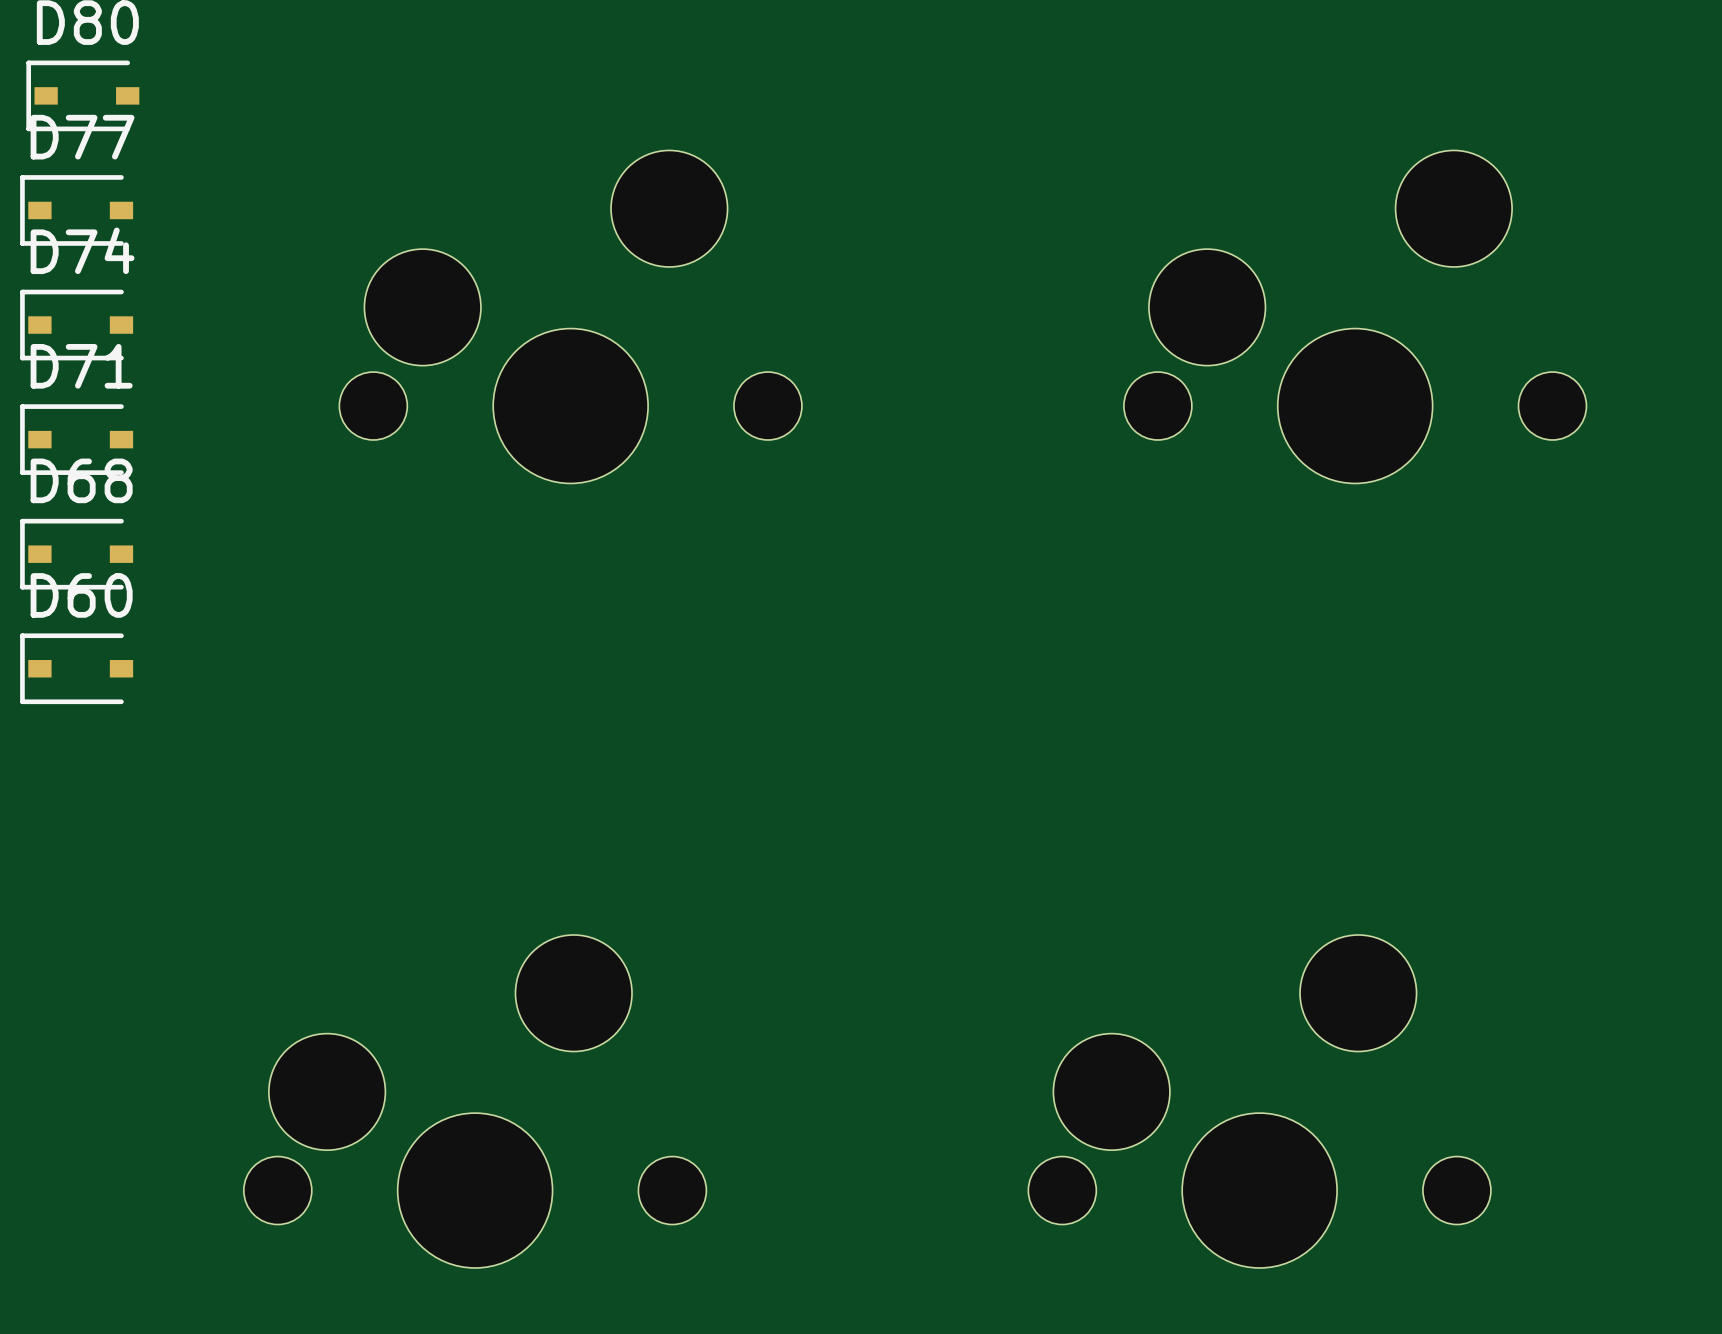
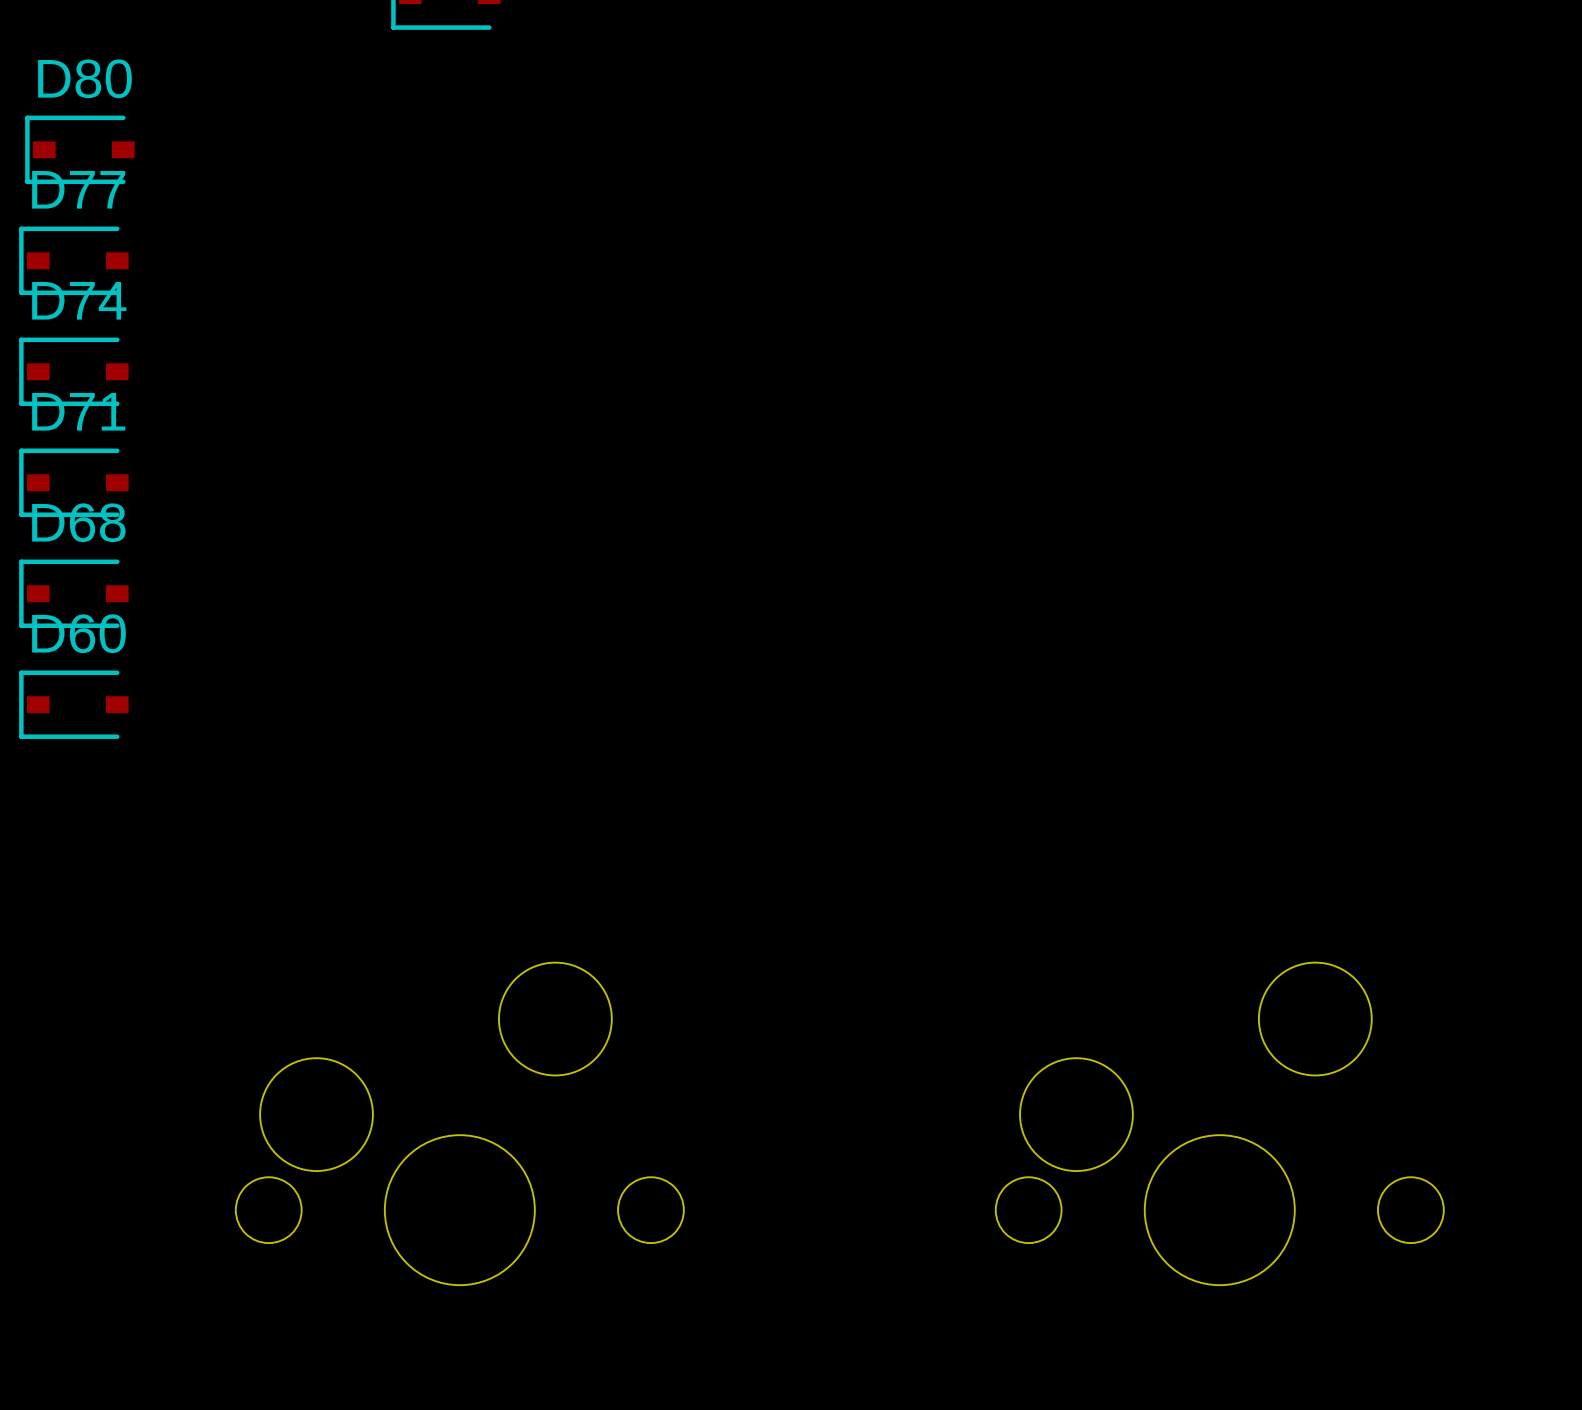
part: (570, 316) -> none
part: (1355, 316) -> none

